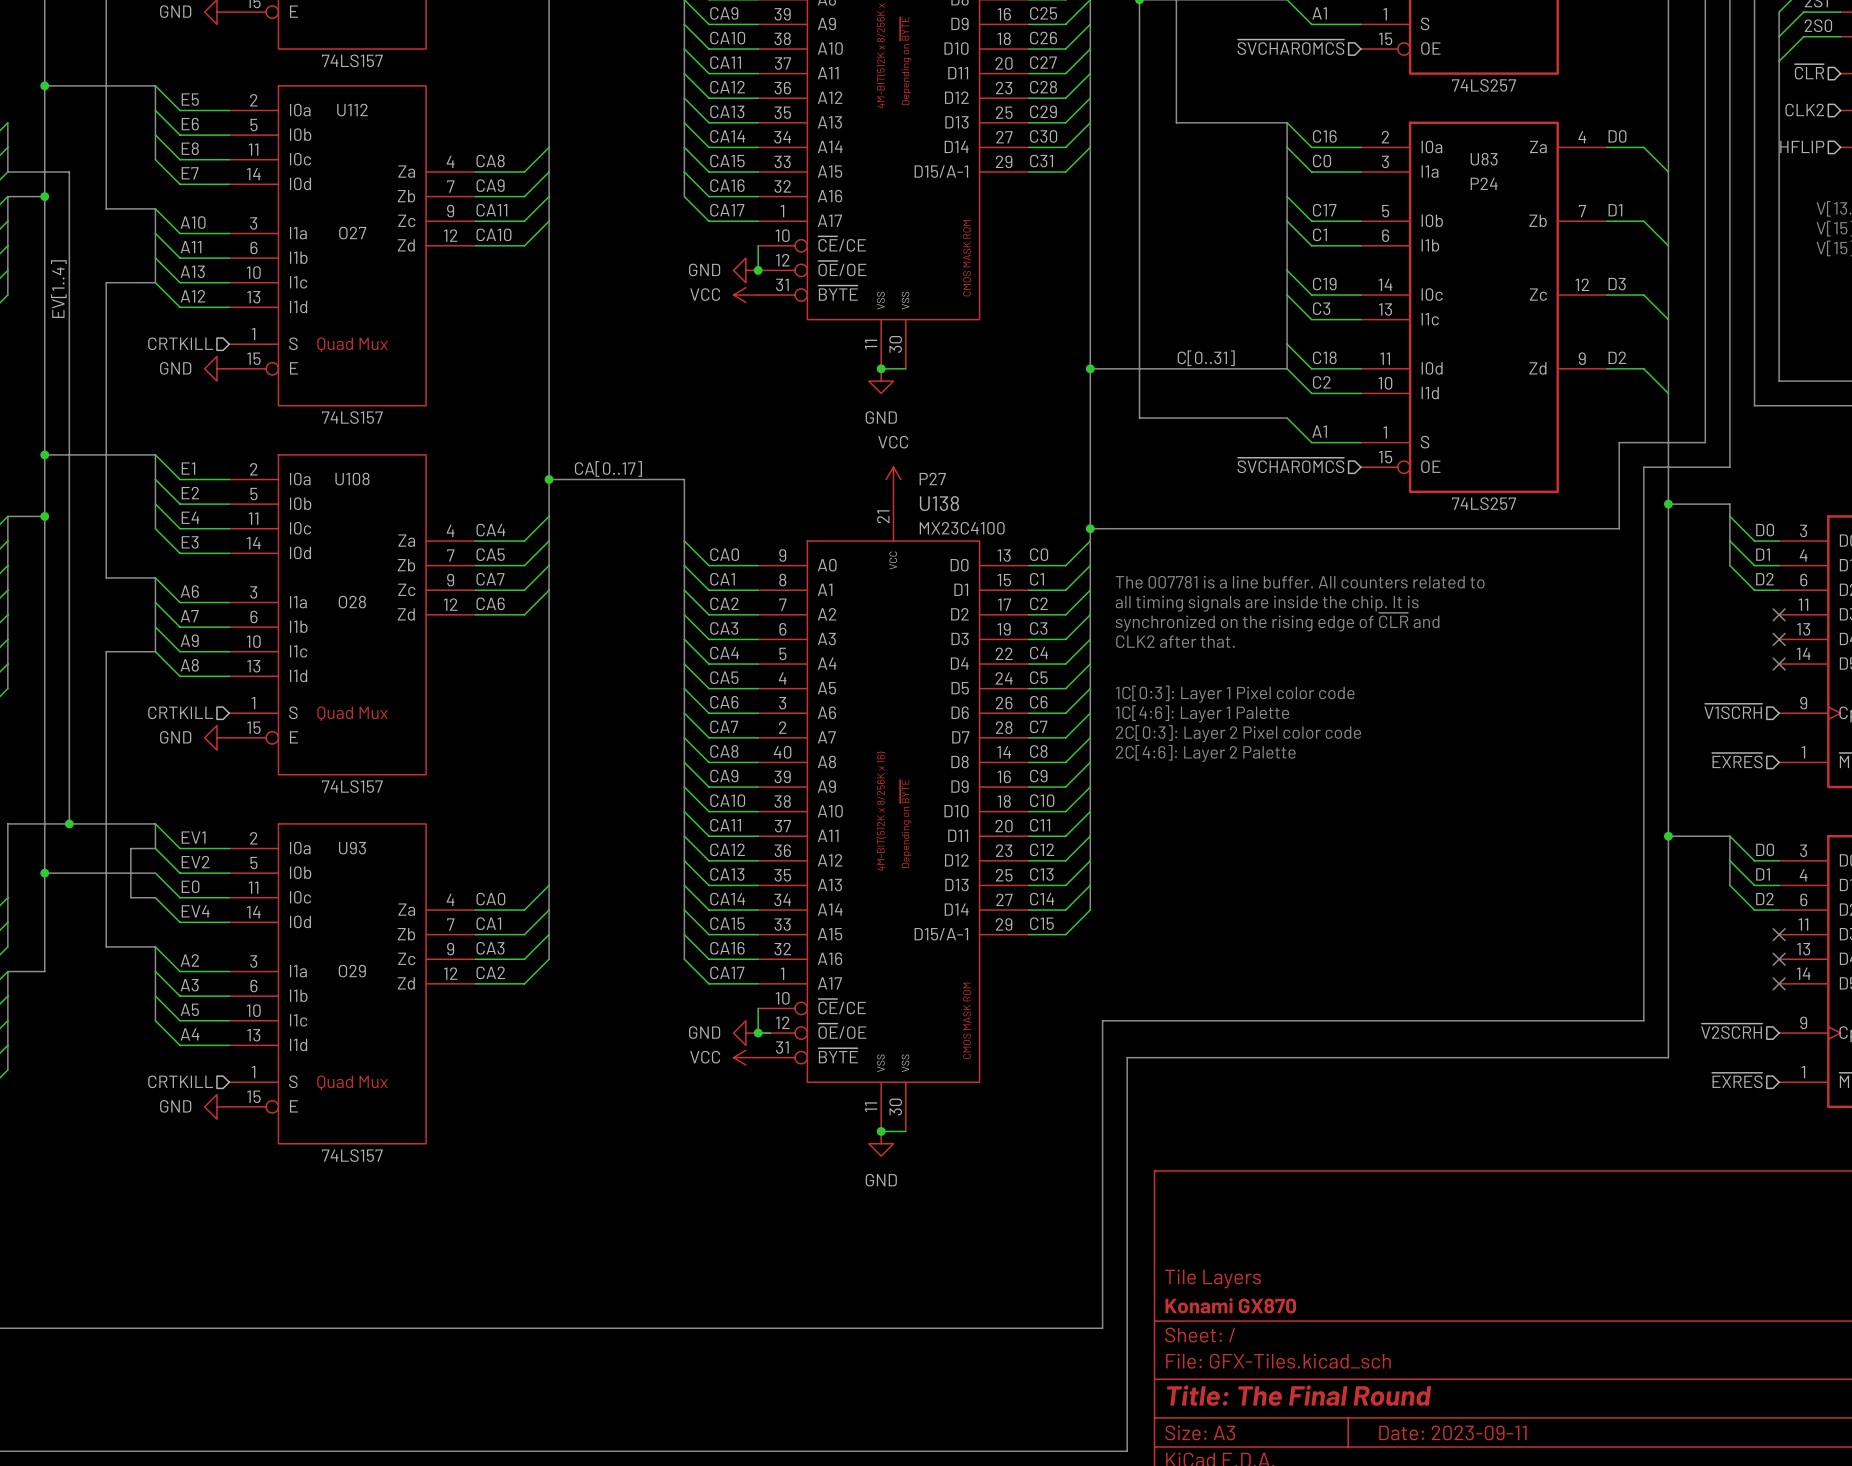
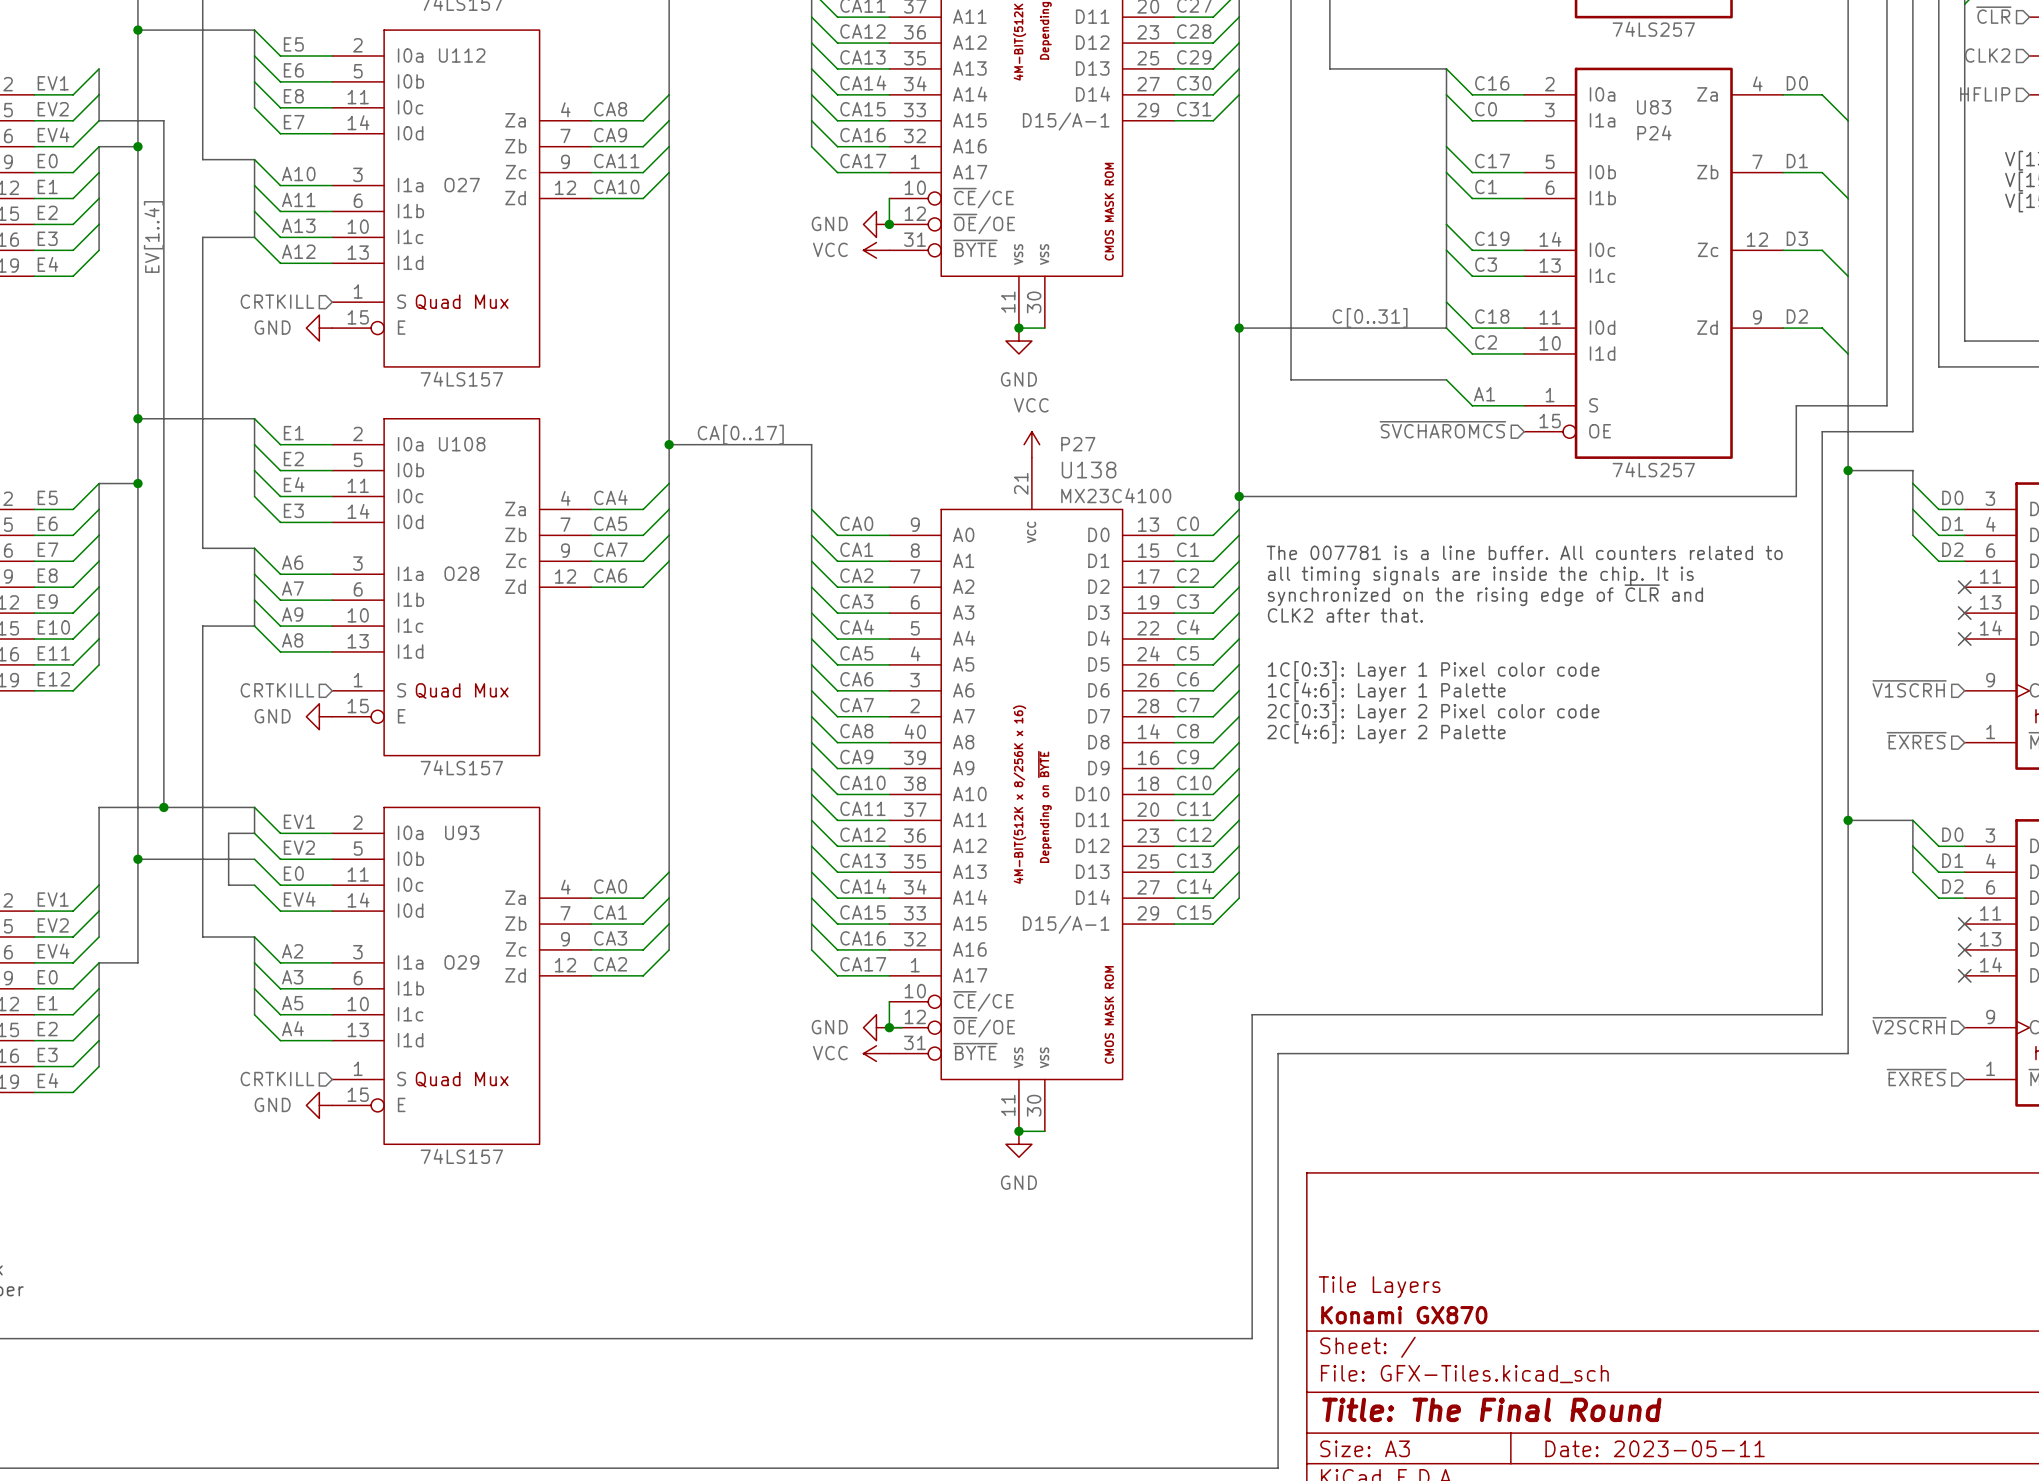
title block: Date: 2023-09-11 (1452, 1432) -> Date: 2023-05-11 (1655, 1448)

